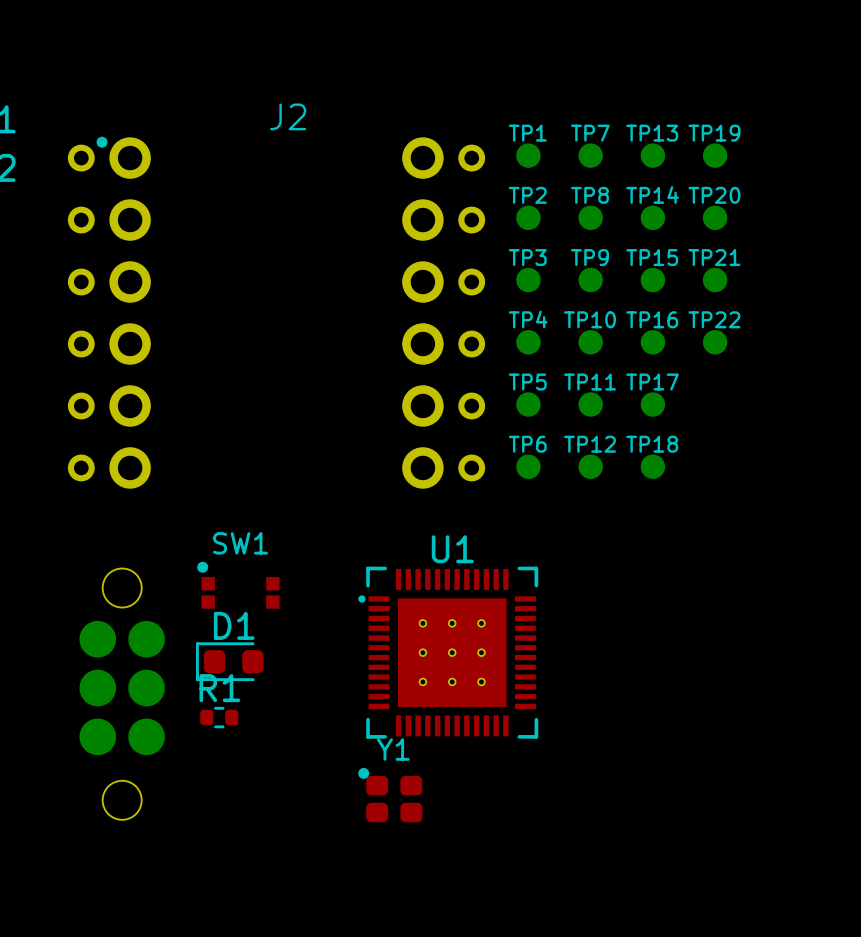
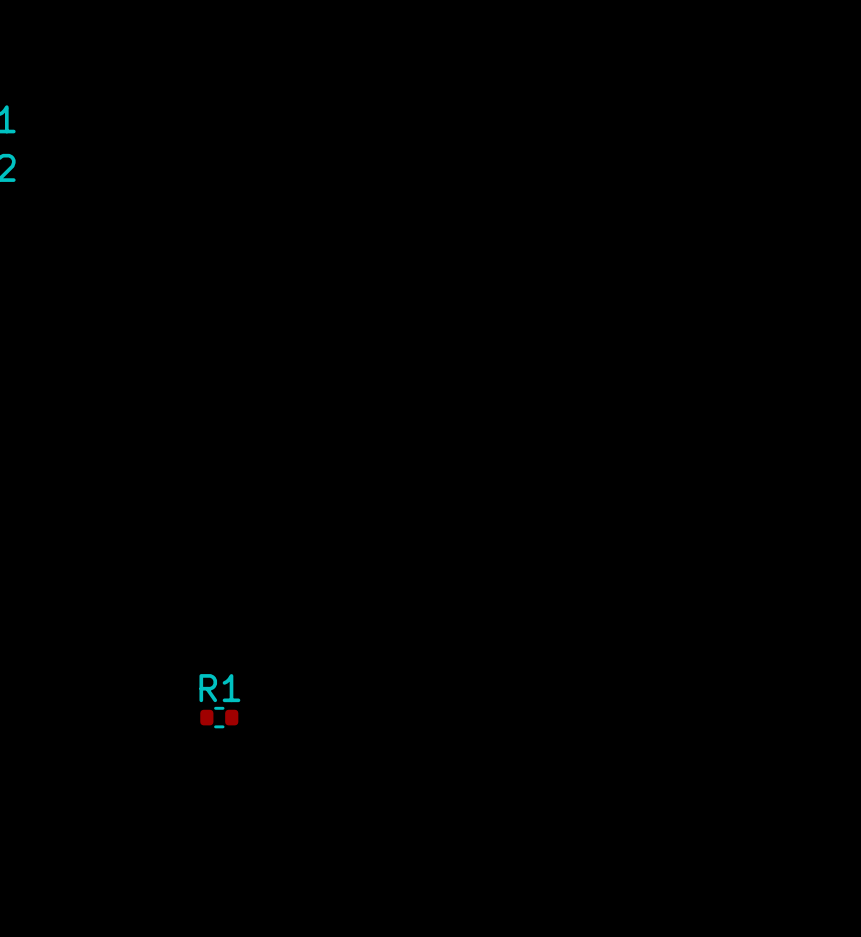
TP1: (528, 155) -> none
TP7: (590, 155) -> none
TP13: (652, 155) -> none
TP19: (715, 155) -> none
TP2: (528, 217) -> none
TP8: (590, 217) -> none
TP14: (652, 217) -> none
TP20: (715, 217) -> none
TP3: (528, 280) -> none
TP9: (590, 280) -> none
TP15: (652, 280) -> none
TP21: (715, 280) -> none
J2: (276, 312) -> none
TP4: (528, 342) -> none
TP10: (590, 342) -> none
TP16: (652, 342) -> none
TP22: (715, 342) -> none
TP5: (528, 404) -> none
TP11: (590, 404) -> none
TP17: (652, 404) -> none
TP6: (528, 466) -> none
TP12: (590, 466) -> none
TP18: (652, 466) -> none
SW1: (238, 585) -> none
U1: (448, 652) -> none
D1: (229, 661) -> none
part: (122, 694) -> none
Y1: (390, 795) -> none

